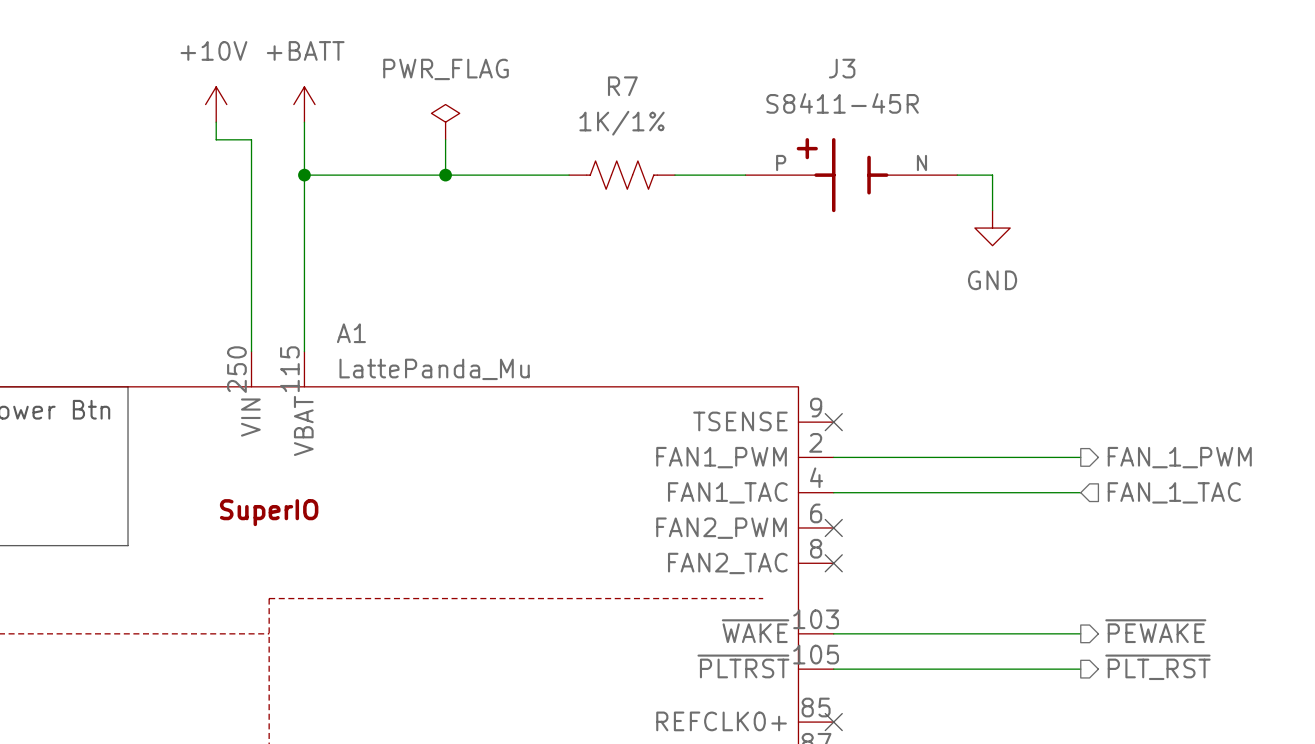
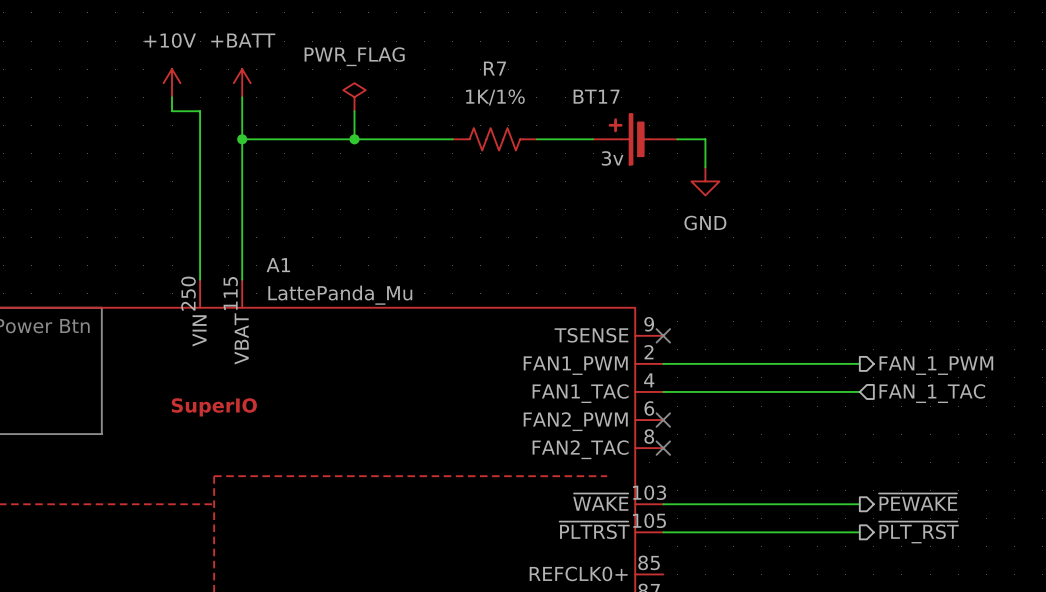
BT17: none -> 3v (635, 139)
J3: S8411-45R (851, 175) -> none
wire: (957, 175) (992, 175) (992, 210) -> (677, 139) (705, 139) (705, 167)
power symbol position: GND (992, 228) -> GND (705, 181)
no-connect mark: (833, 722) -> none

